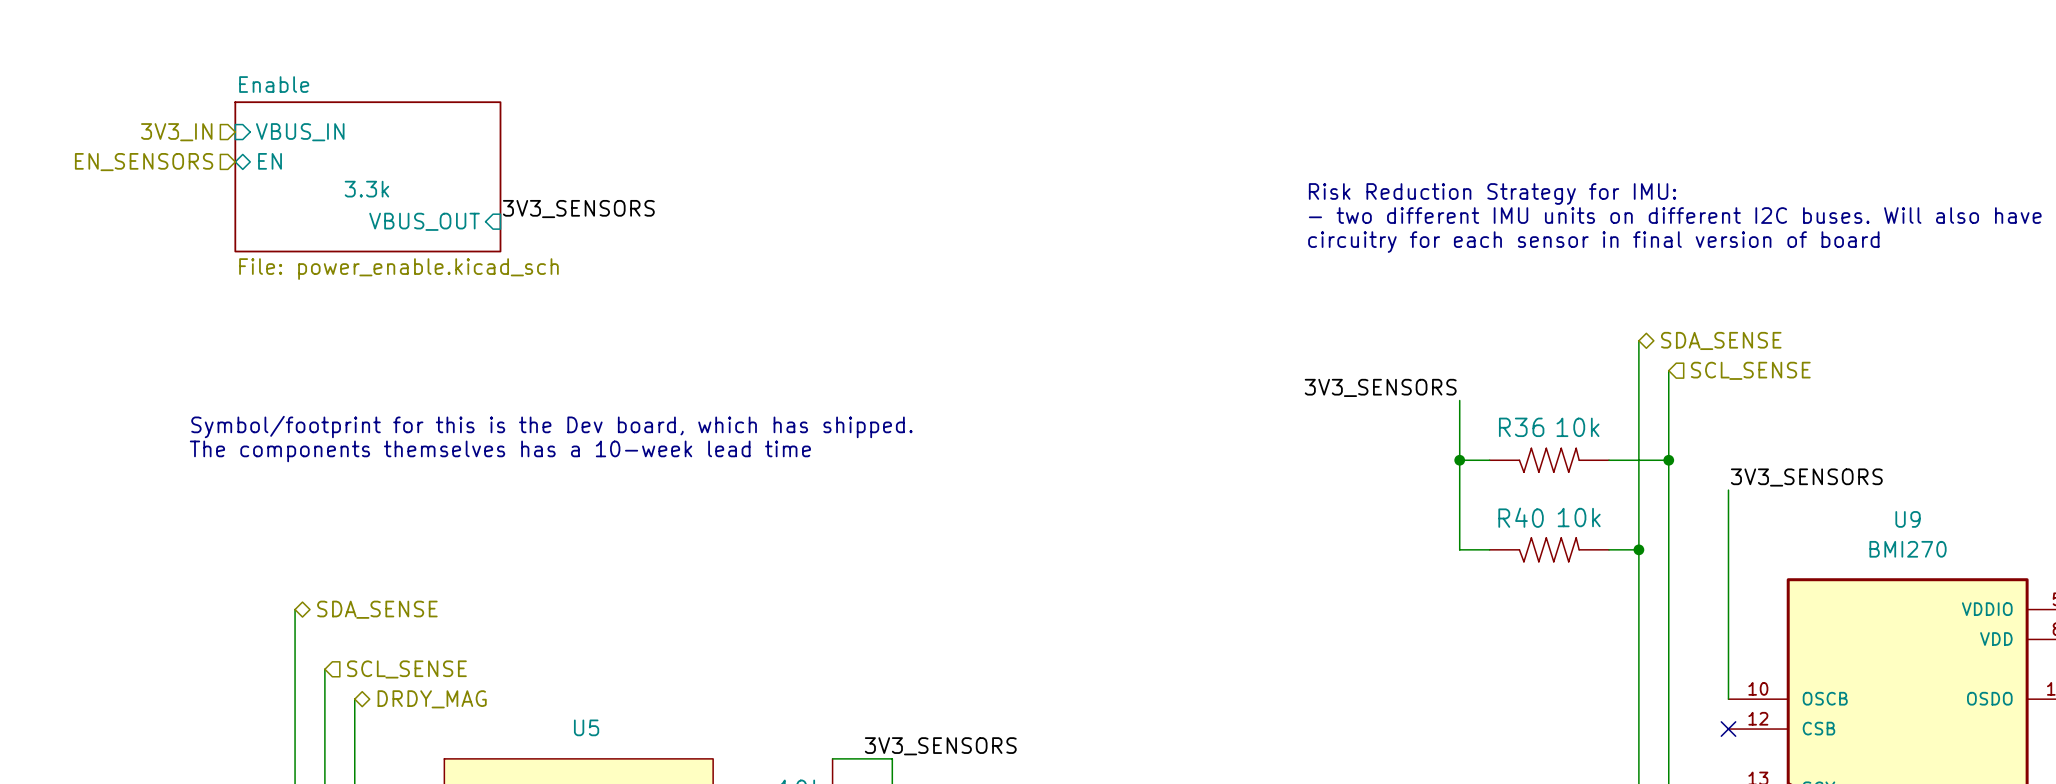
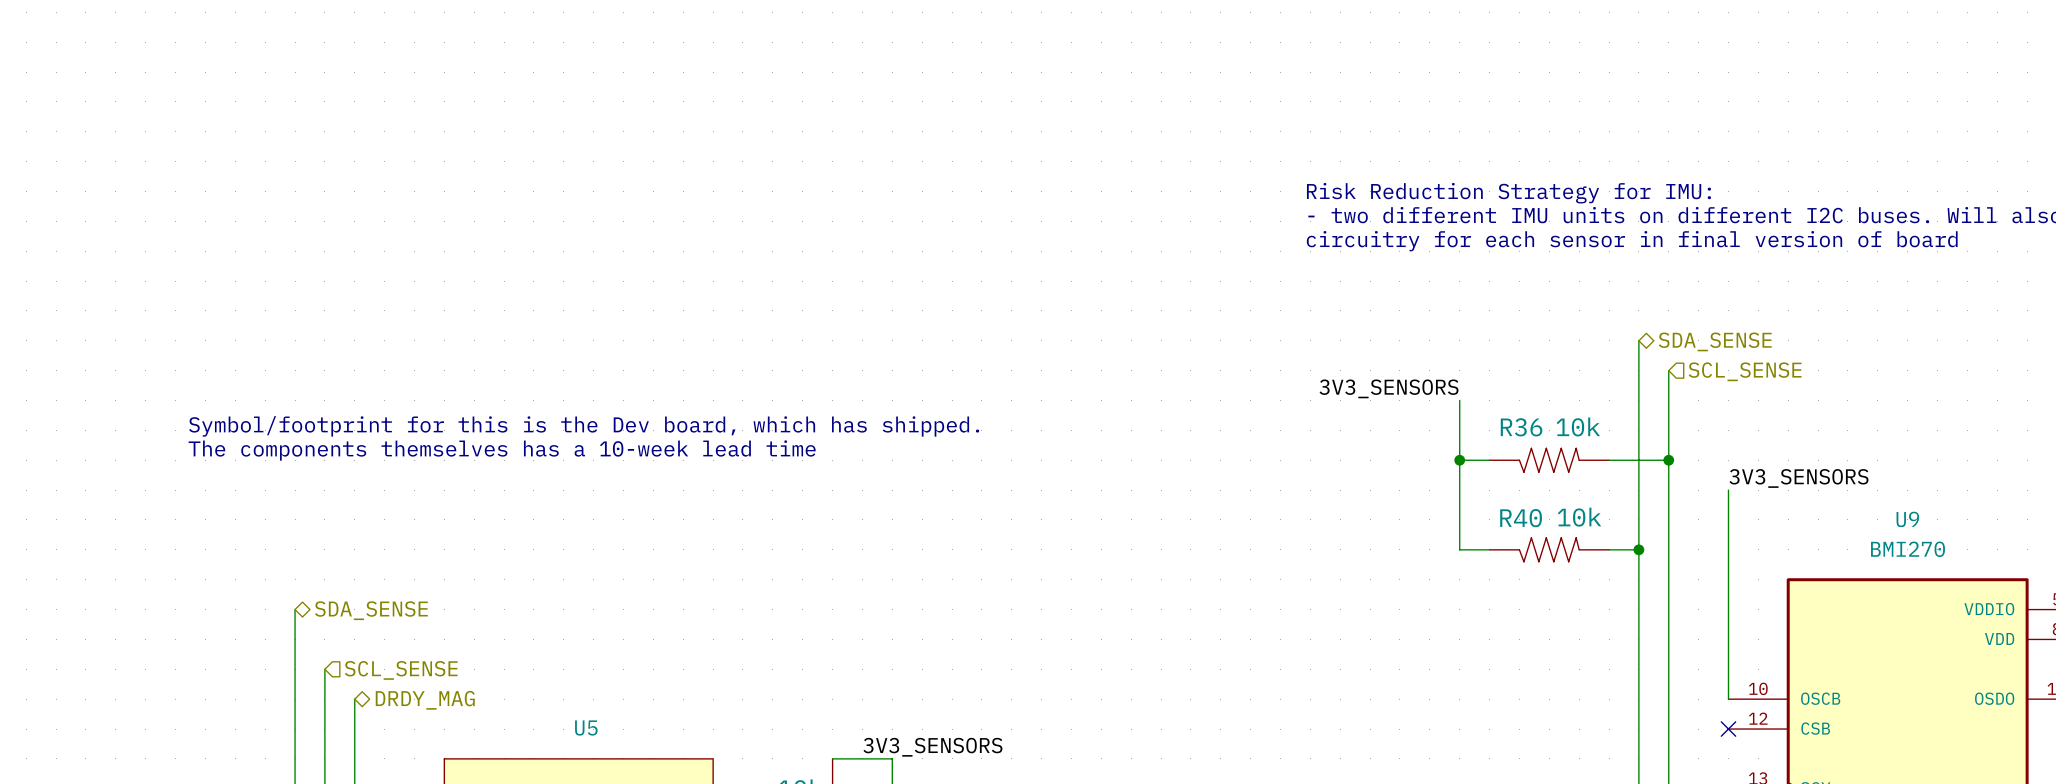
hierarchical label: 3V3_IN (176, 132) -> none
sheet pin: VBUS_IN (300, 132) -> none
sheet pin: EN (270, 161) -> none
hierarchical label: EN_SENSORS (144, 162) -> none
sheet Enable: File: power_enable.kicad_sch (367, 176) -> none
label: 3V3_SENSORS (578, 209) -> none
sheet pin: VBUS_OUT (424, 221) -> none

